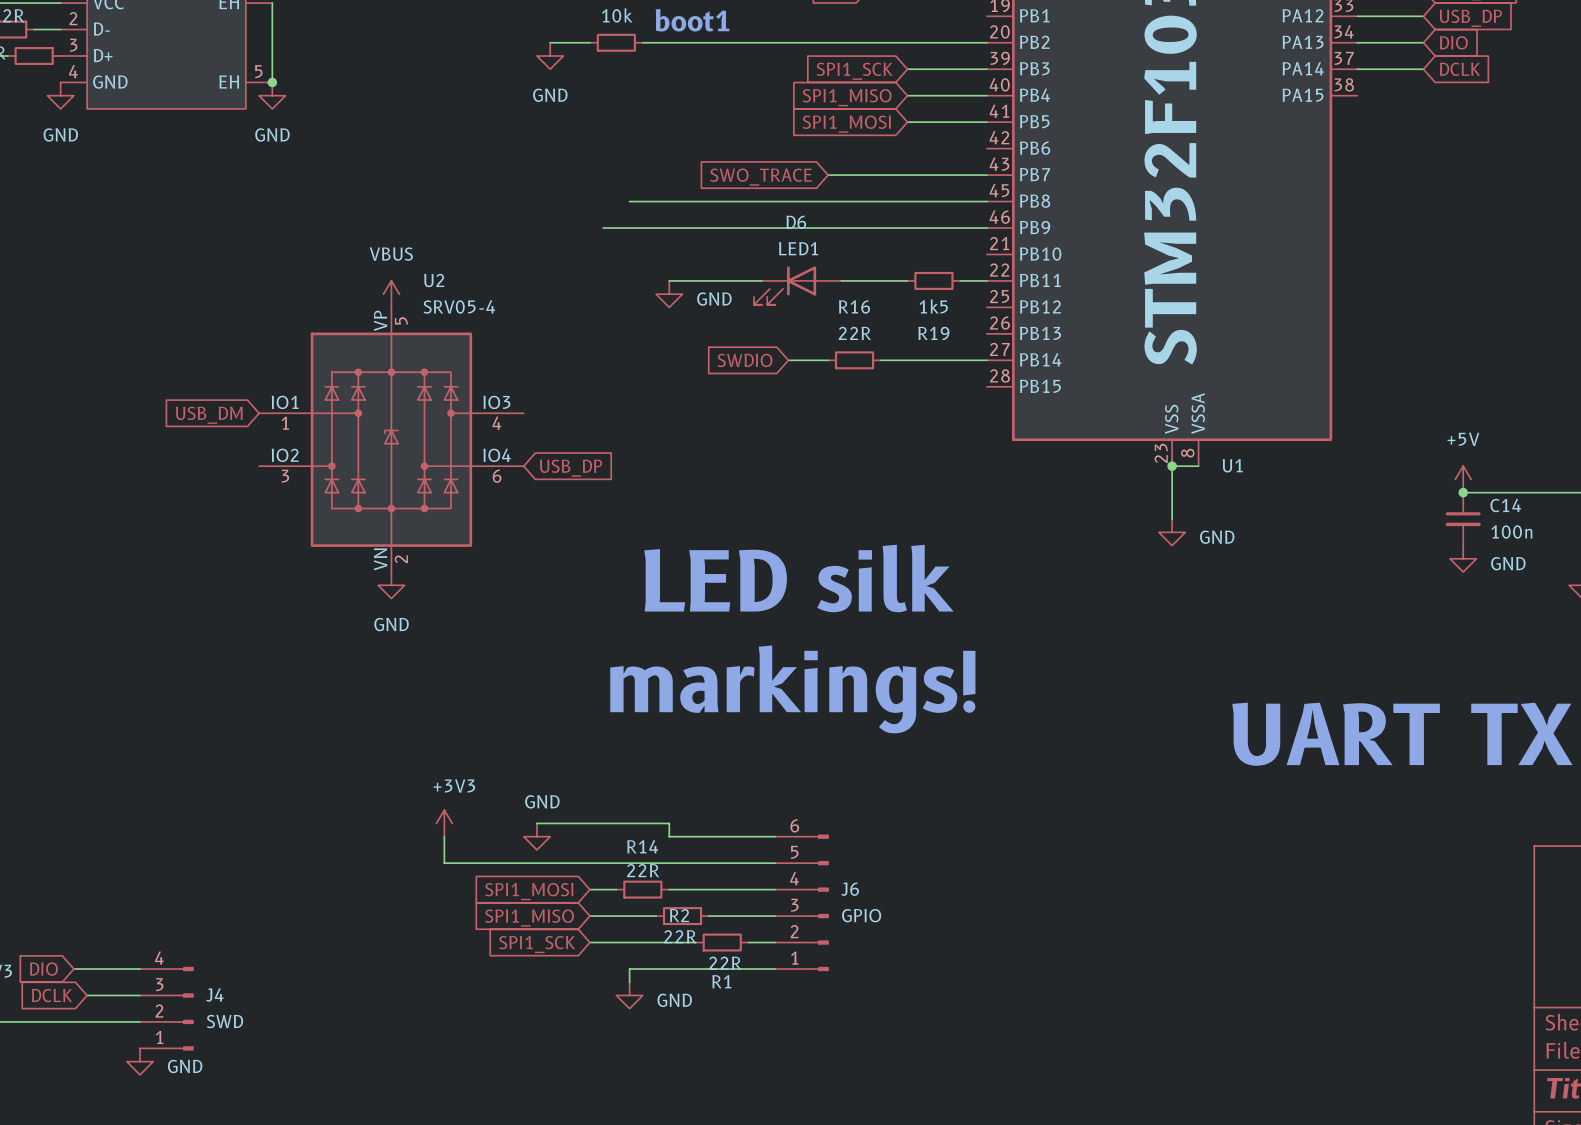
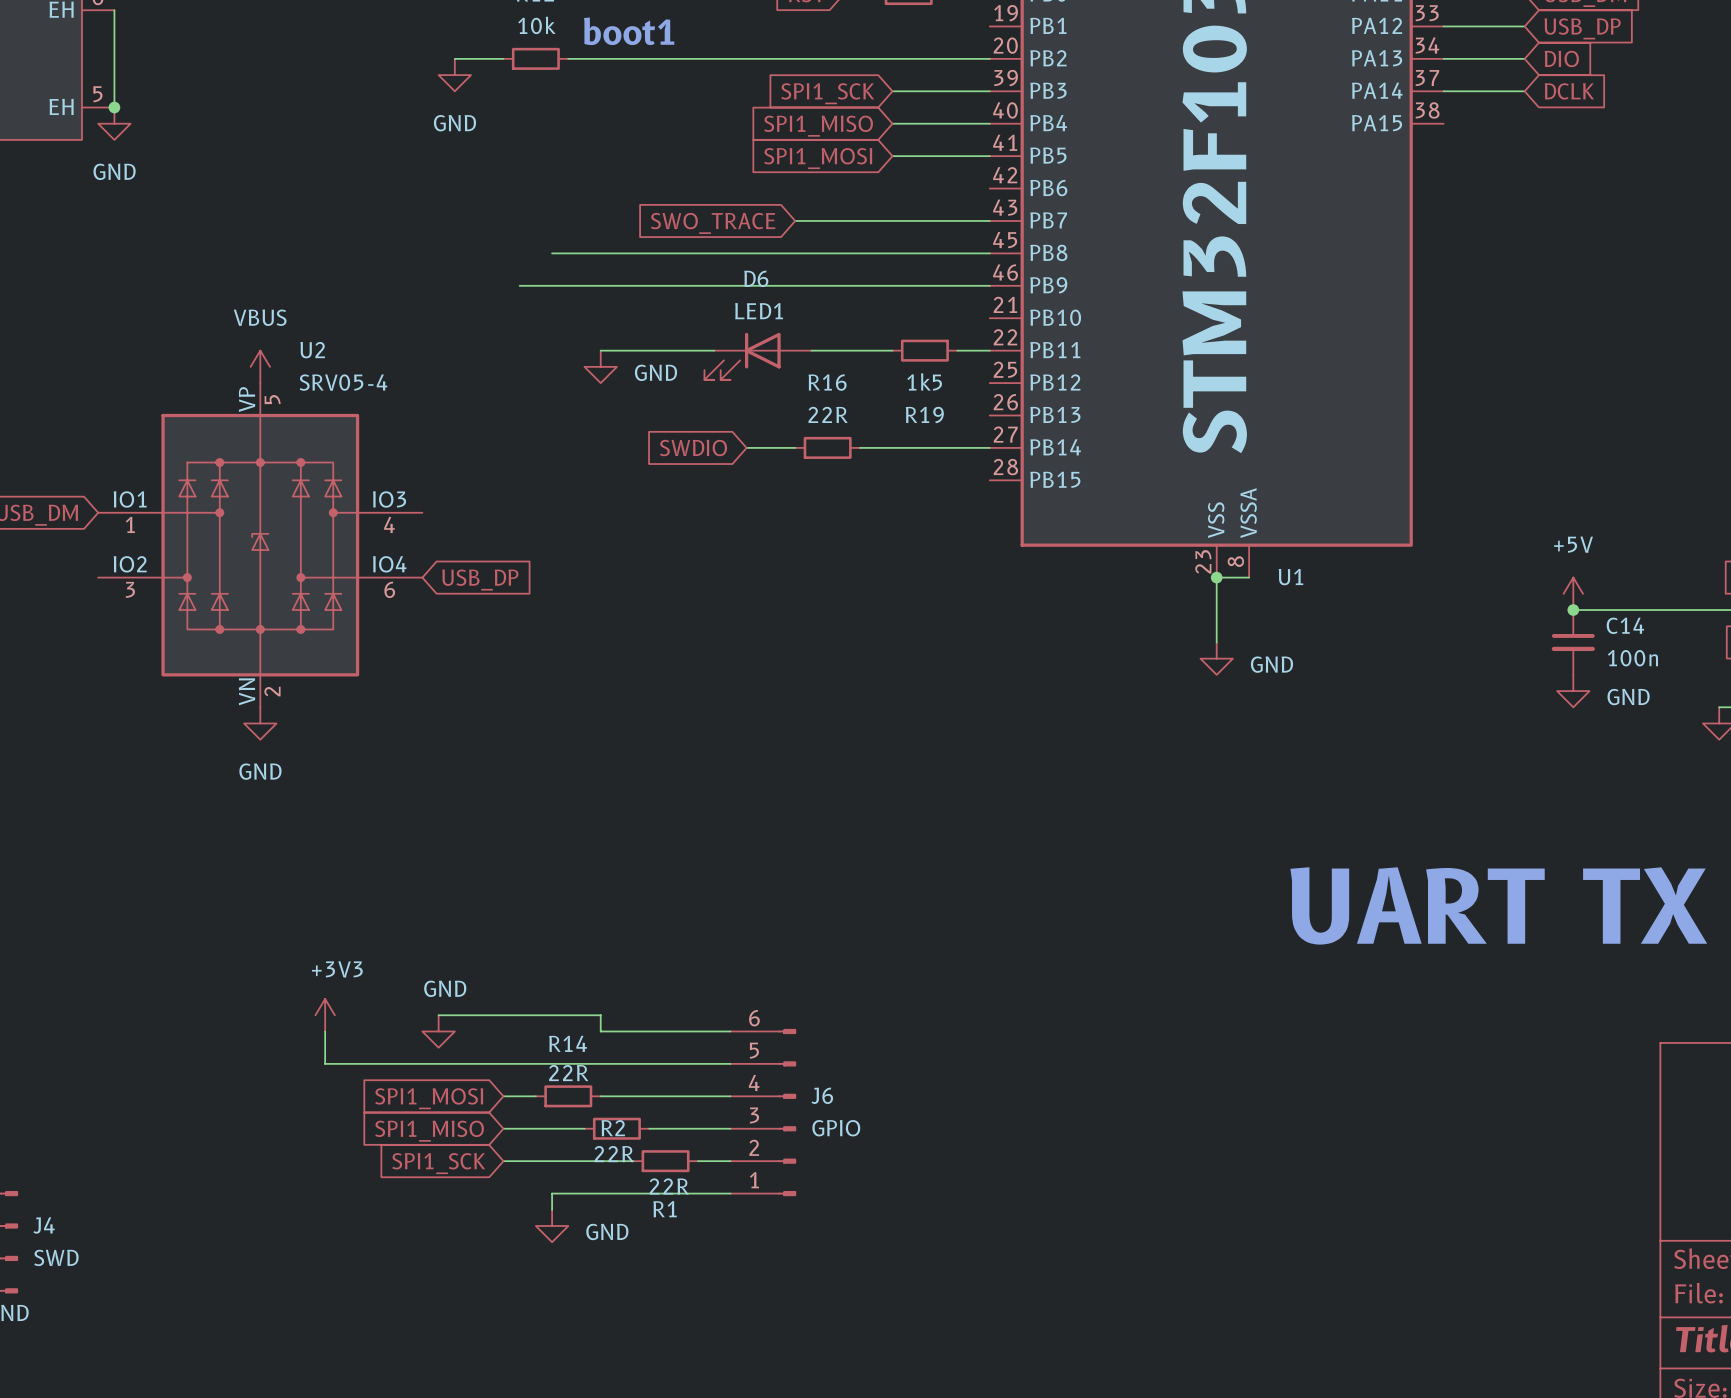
text: LED silk (798, 578) -> none
text: markings! (792, 689) -> none

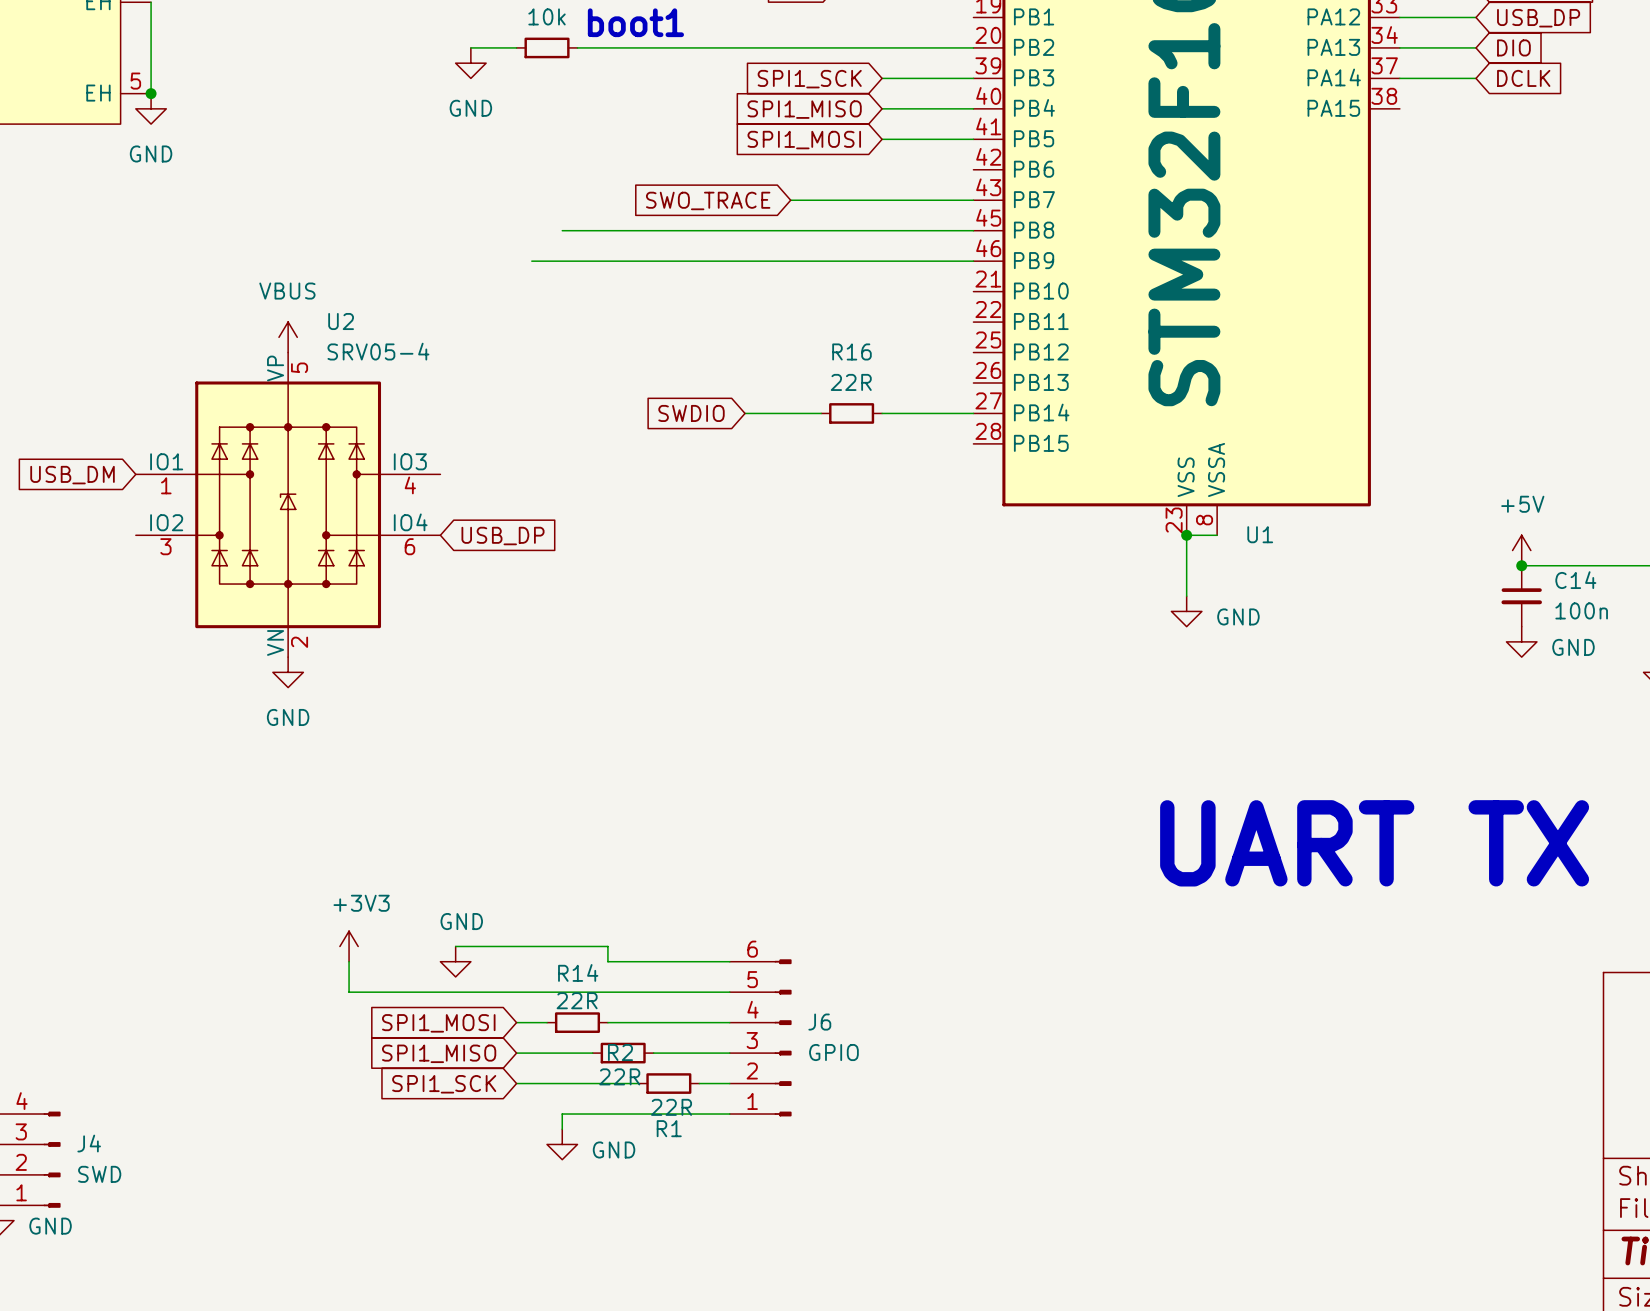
wire: (600, 350) (714, 350) -> none
wire: (811, 350) (892, 350) -> none
R19: 1k5 (924, 350) -> none
wire: (957, 350) (989, 350) -> none
D6: LED1 (757, 356) -> none
power symbol: GND (600, 366) -> none
R16 position: (827, 447) -> (851, 413)
wire: (860, 447) (892, 447) -> (790, 413) (821, 413)

